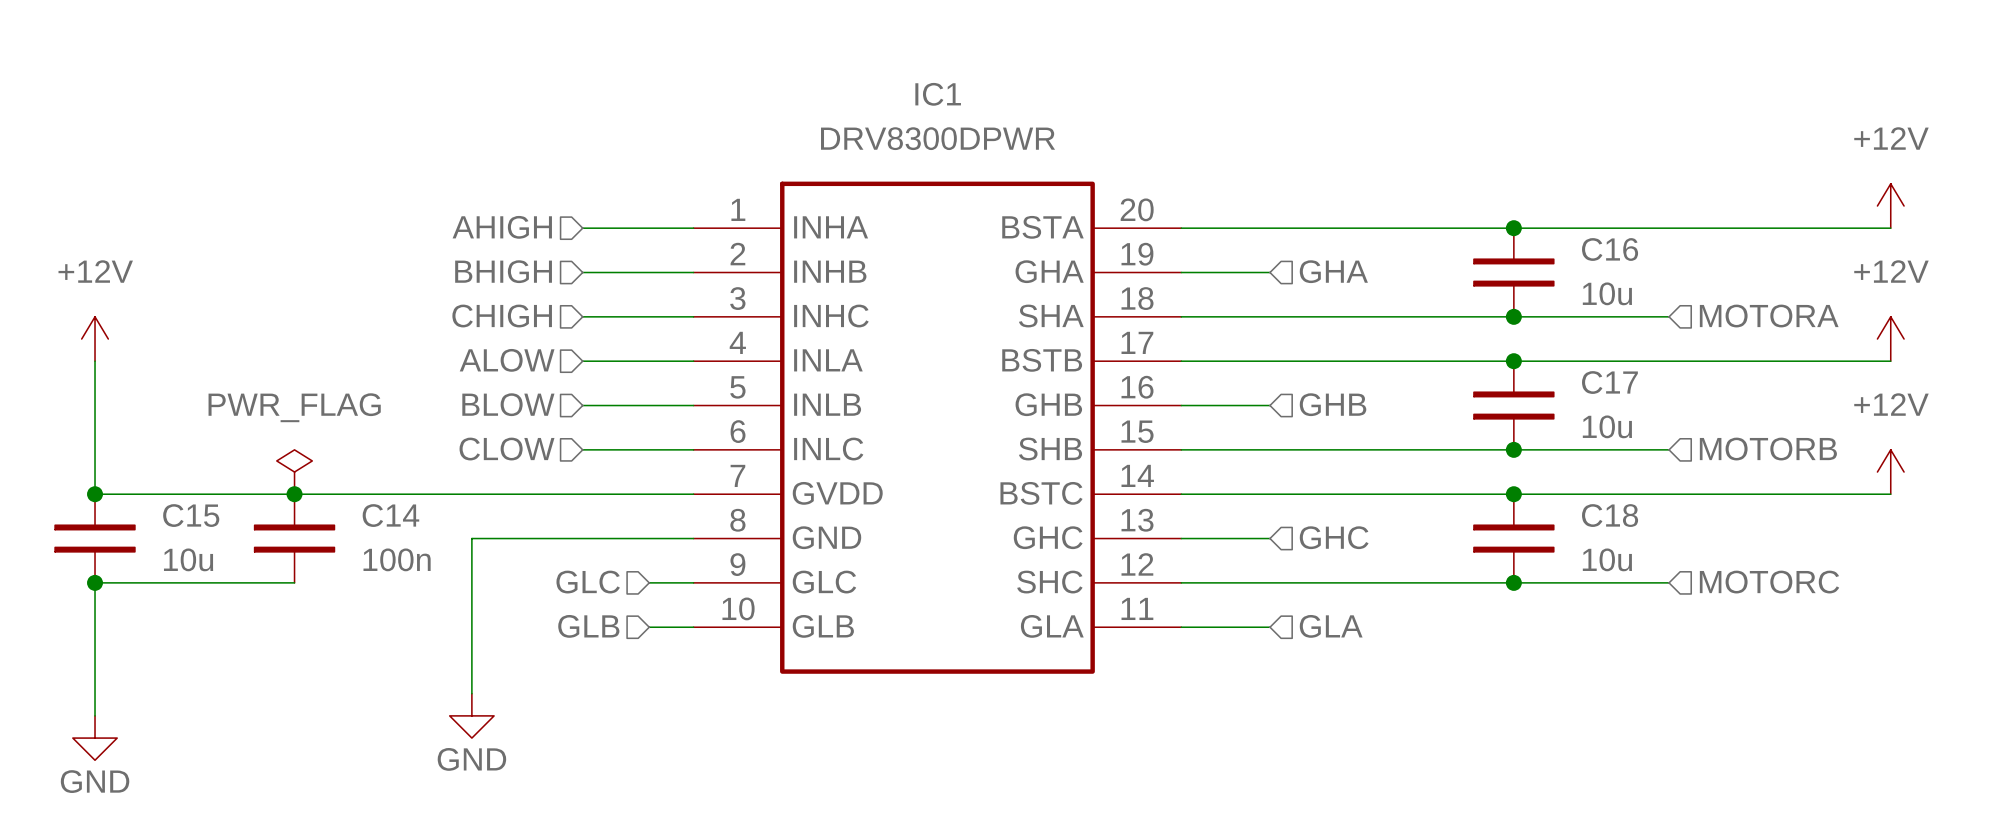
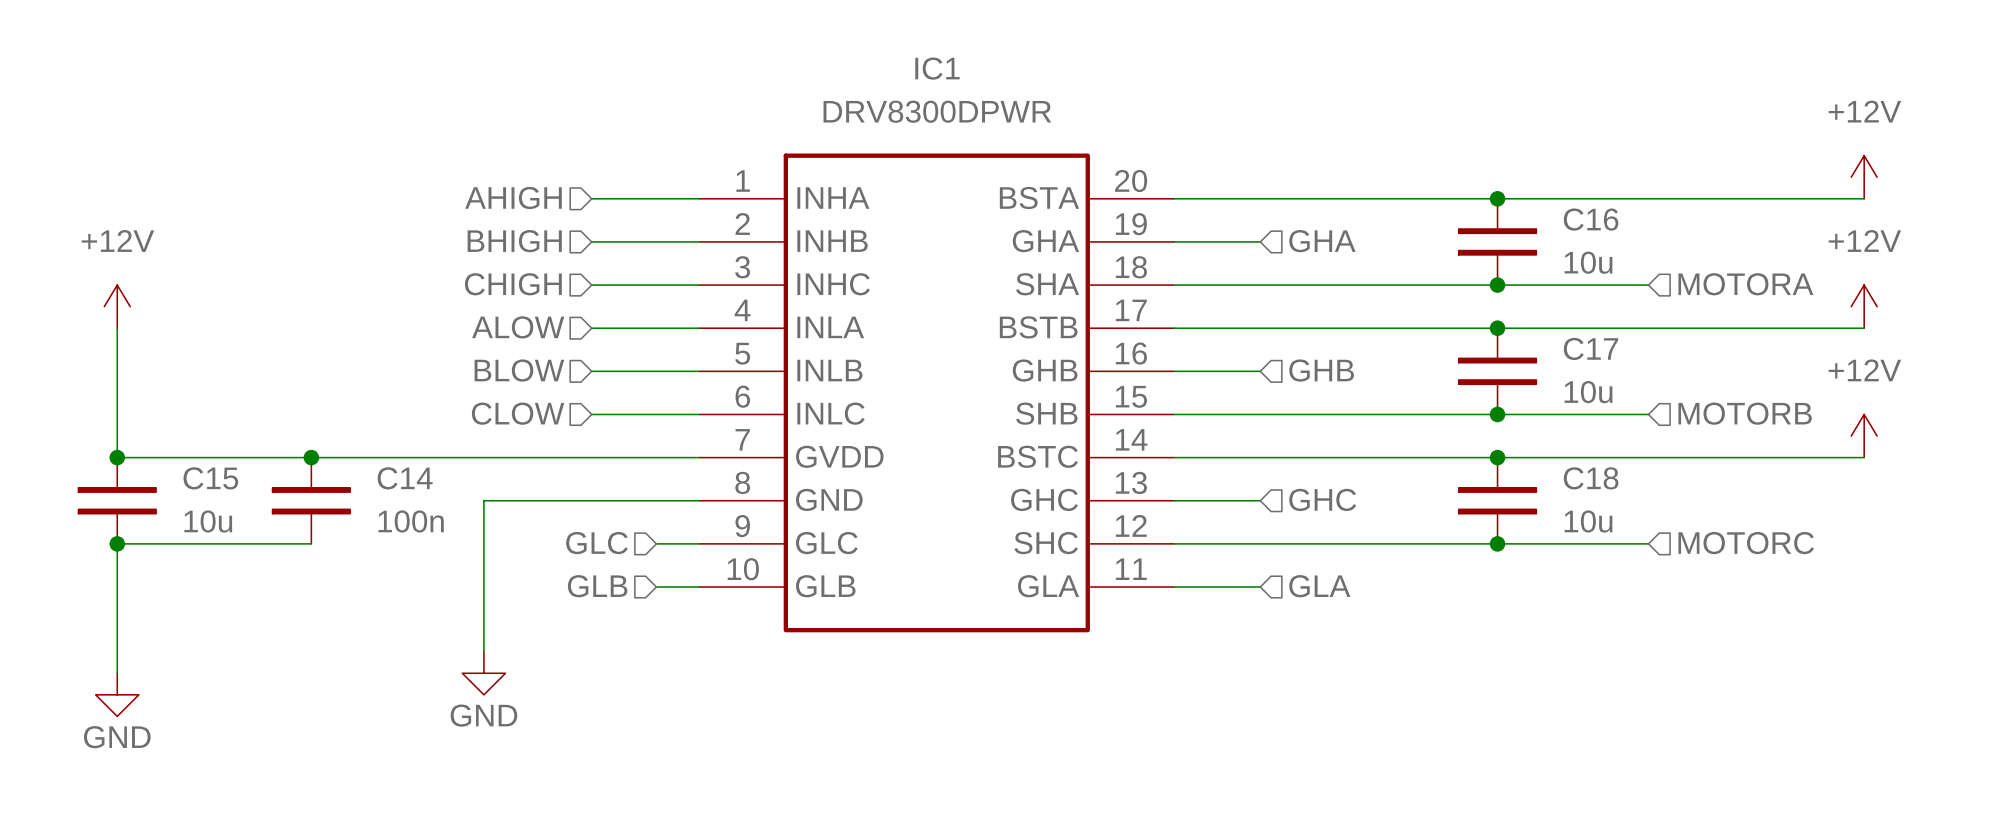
power symbol: PWR_FLAG (294, 472) -> none

